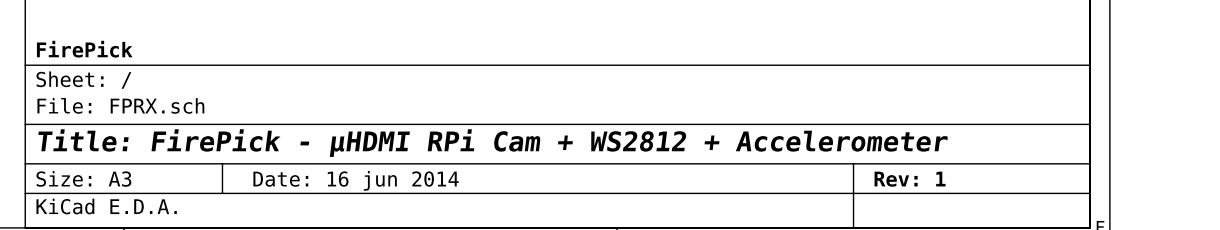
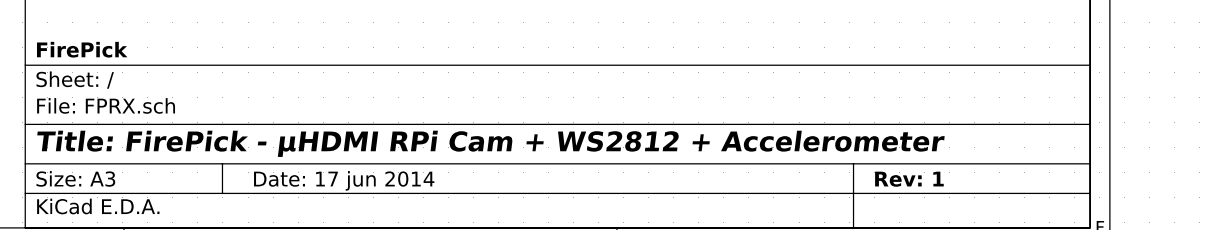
title block: Date: 16 jun 2014 (356, 180) -> Date: 17 jun 2014 (344, 180)

